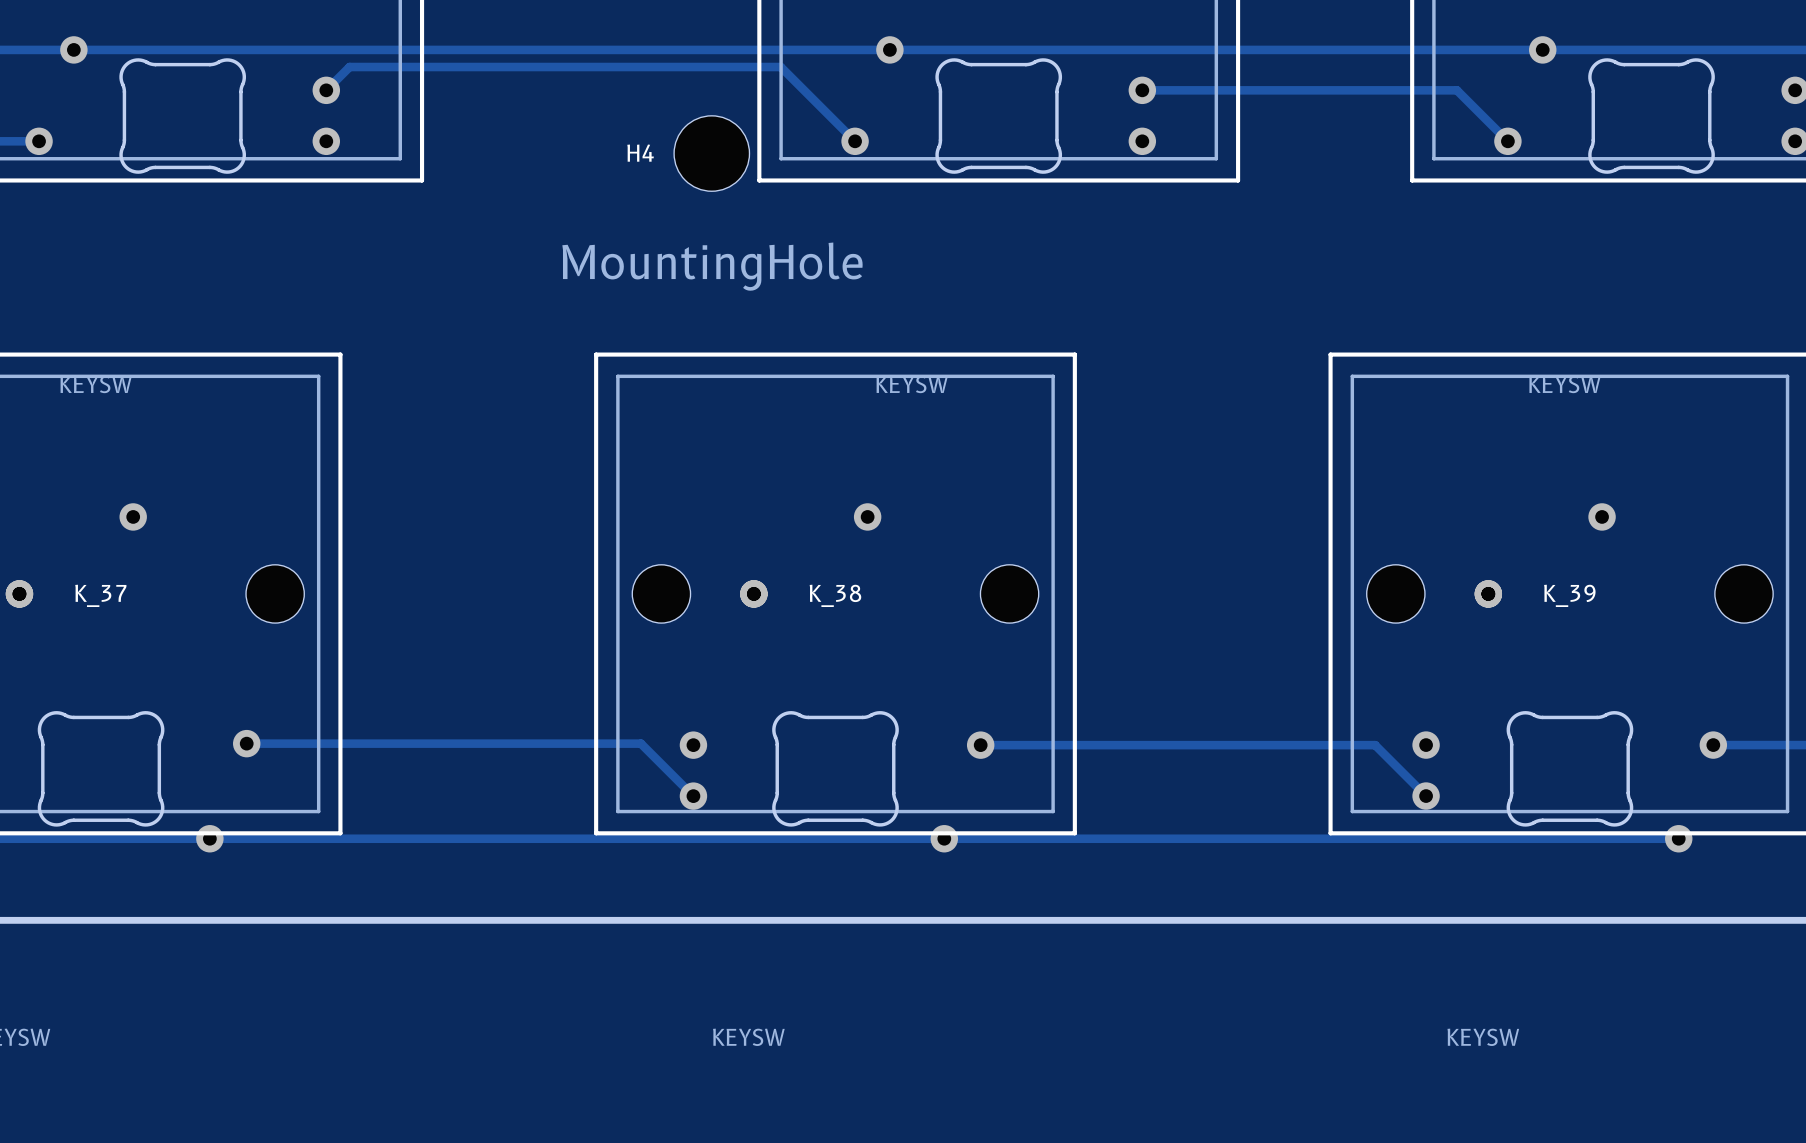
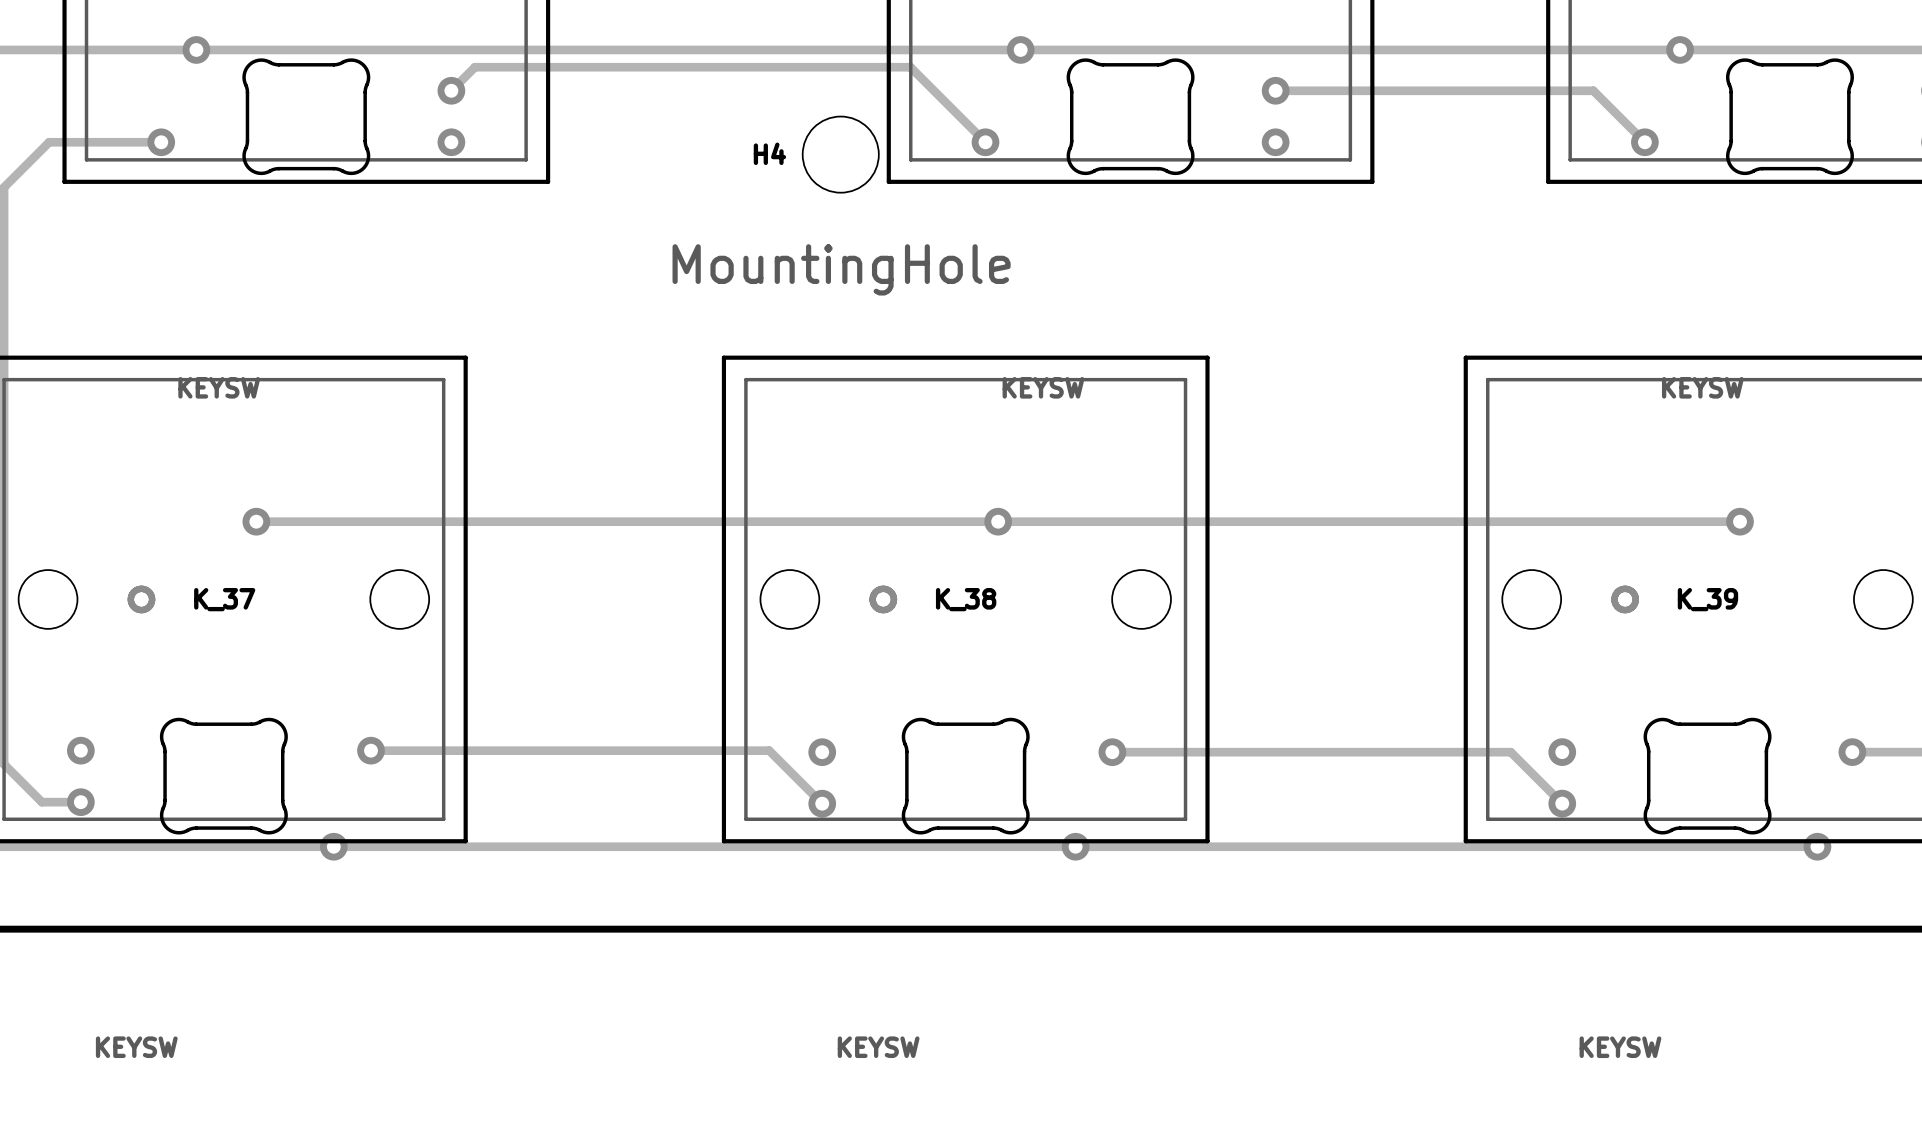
track: none -> (256, 521) (1740, 521)

